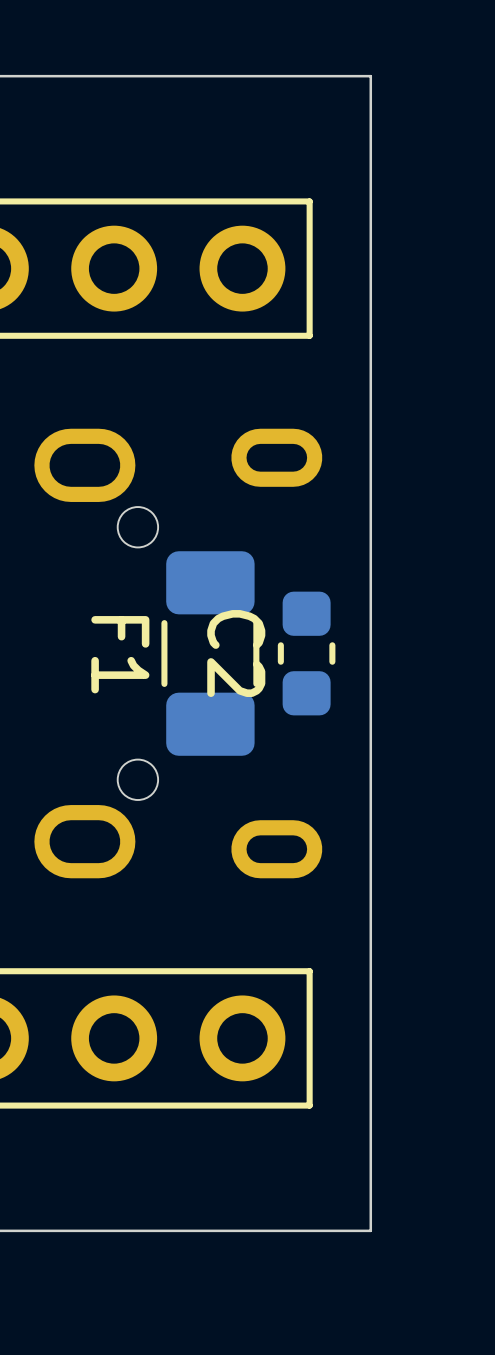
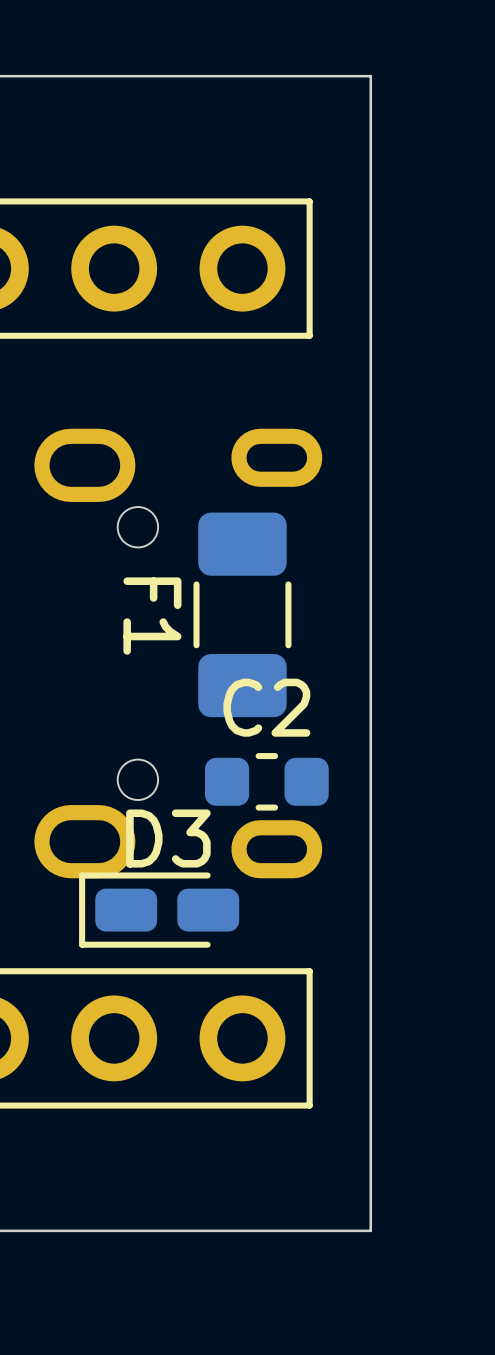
F1 position: (210, 653) -> (242, 614)
C2 rotation: 0° (306, 653) -> 90° clockwise (266, 781)
C2 position: (306, 653) -> (266, 781)
D3: none -> (159, 910)

